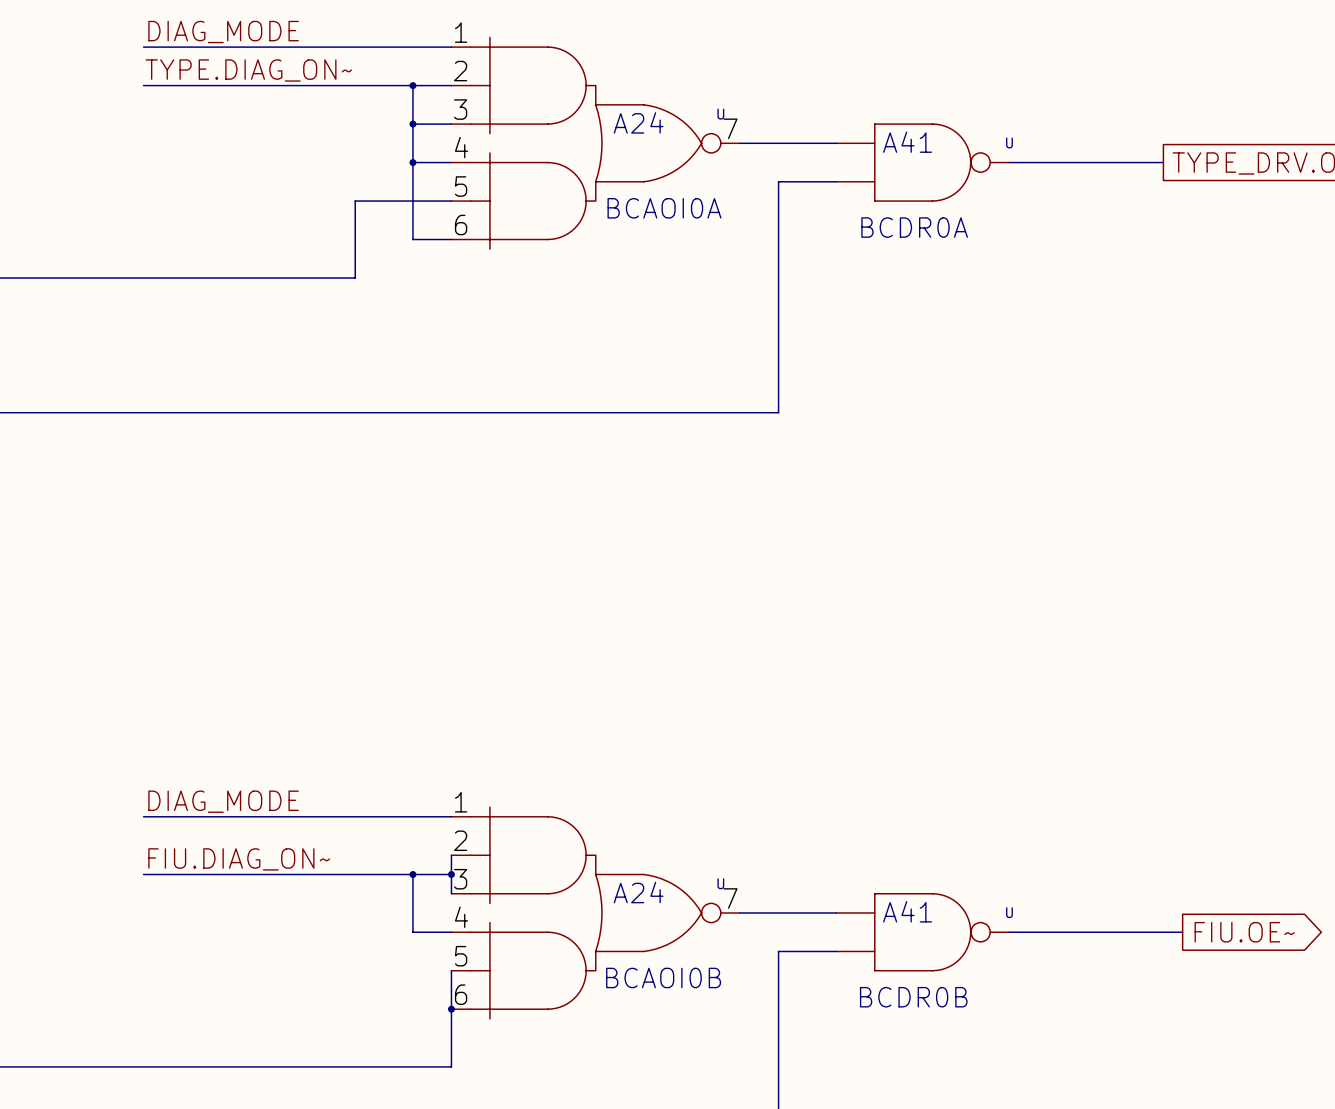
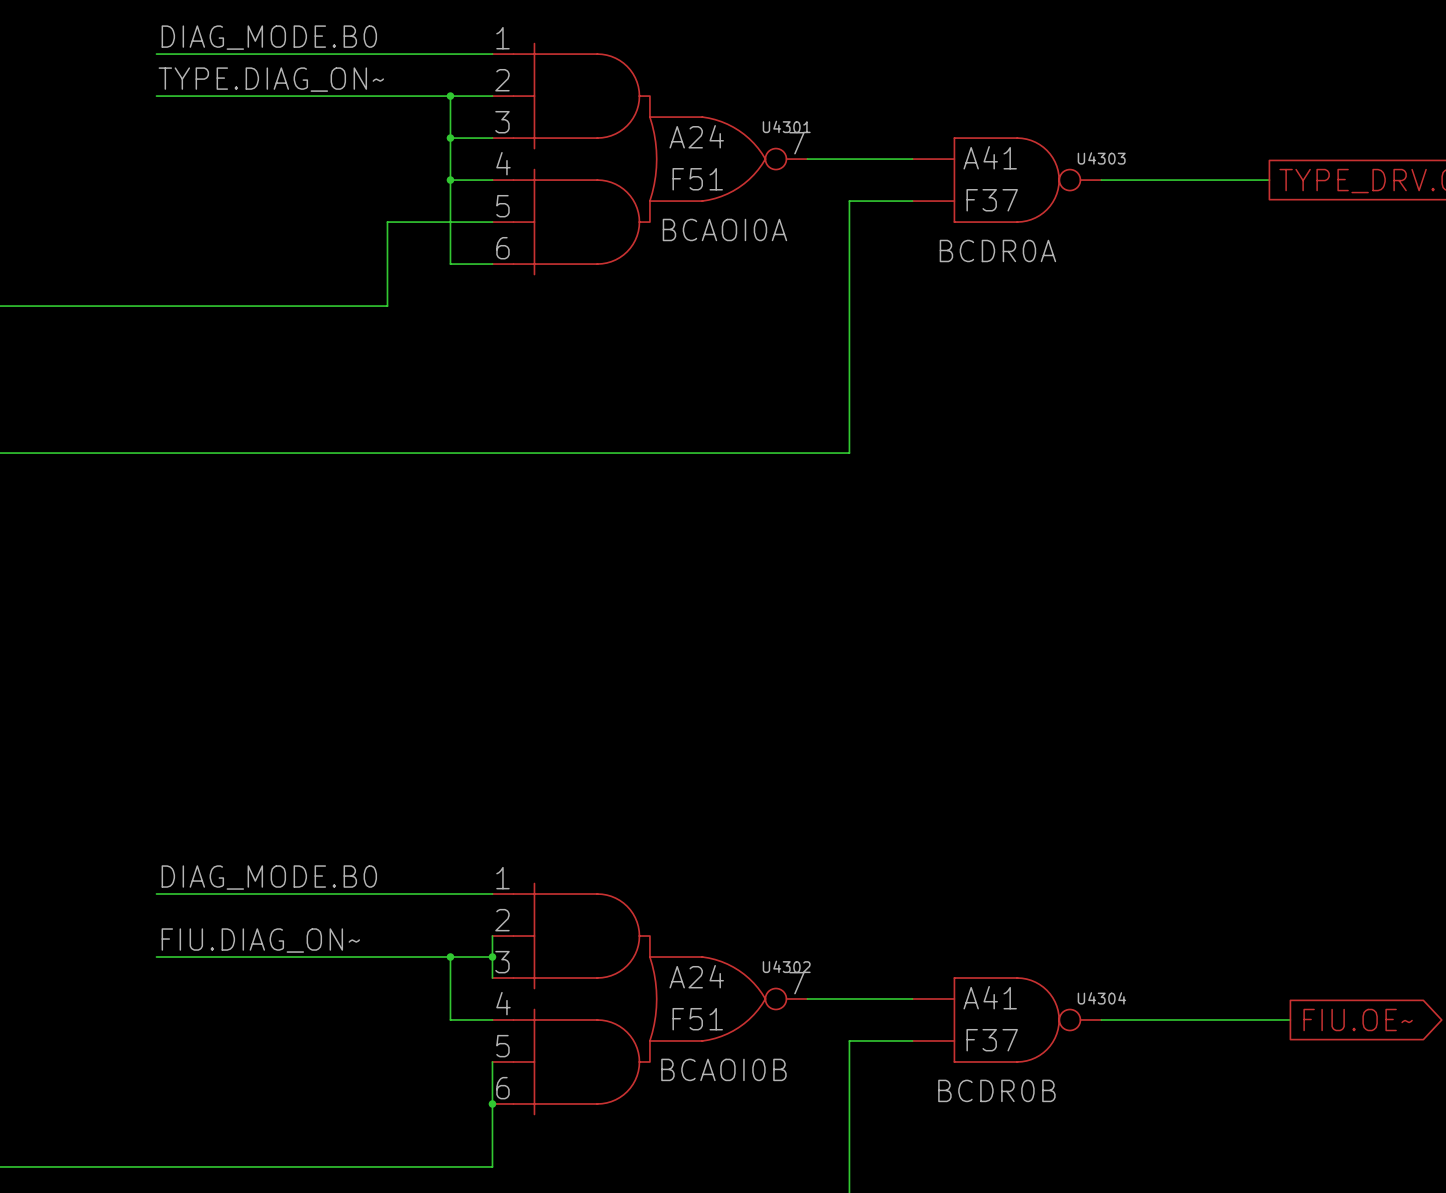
label: DIAG_MODE (223, 32) -> DIAG_MODE.B0 (269, 37)
U name: U (720, 114) -> U4301 (786, 126)
U name: U (1009, 142) -> U4303 (1101, 158)
U value: none -> F51 (697, 179)
U value: none -> F37 (992, 200)
label: DIAG_MODE (223, 801) -> DIAG_MODE.B0 (269, 877)
U name: U (720, 883) -> U4302 (786, 966)
U name: U (1009, 912) -> U4304 (1101, 998)
U value: none -> F51 (697, 1019)
U value: none -> F37 (992, 1040)

